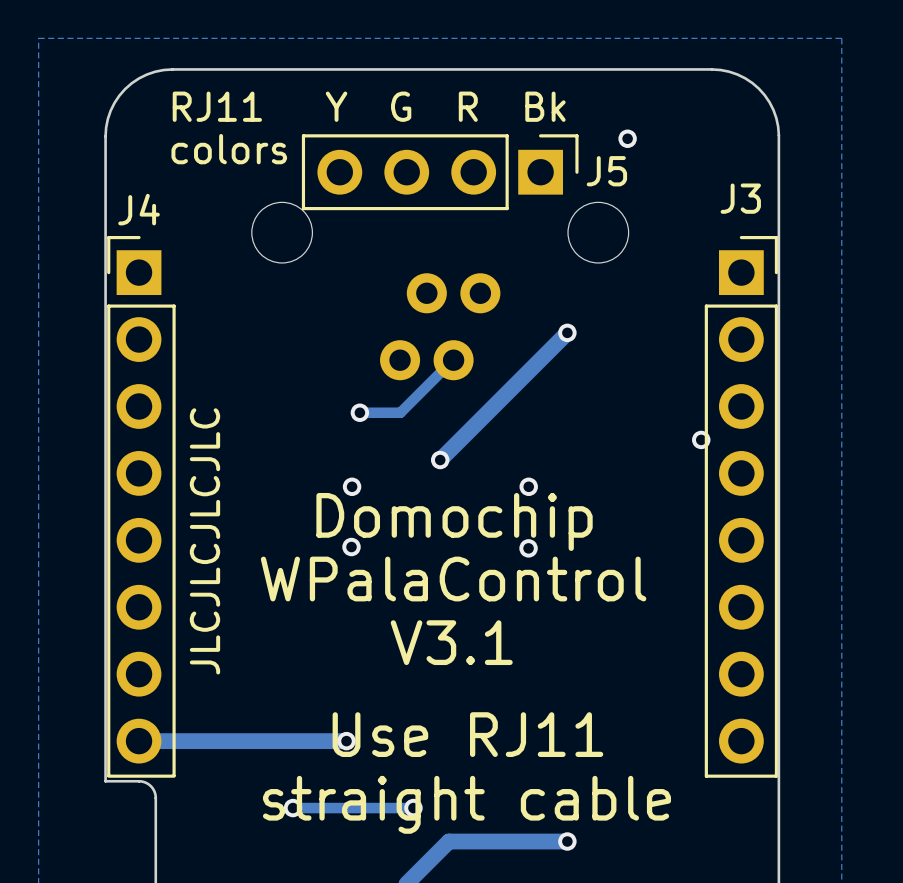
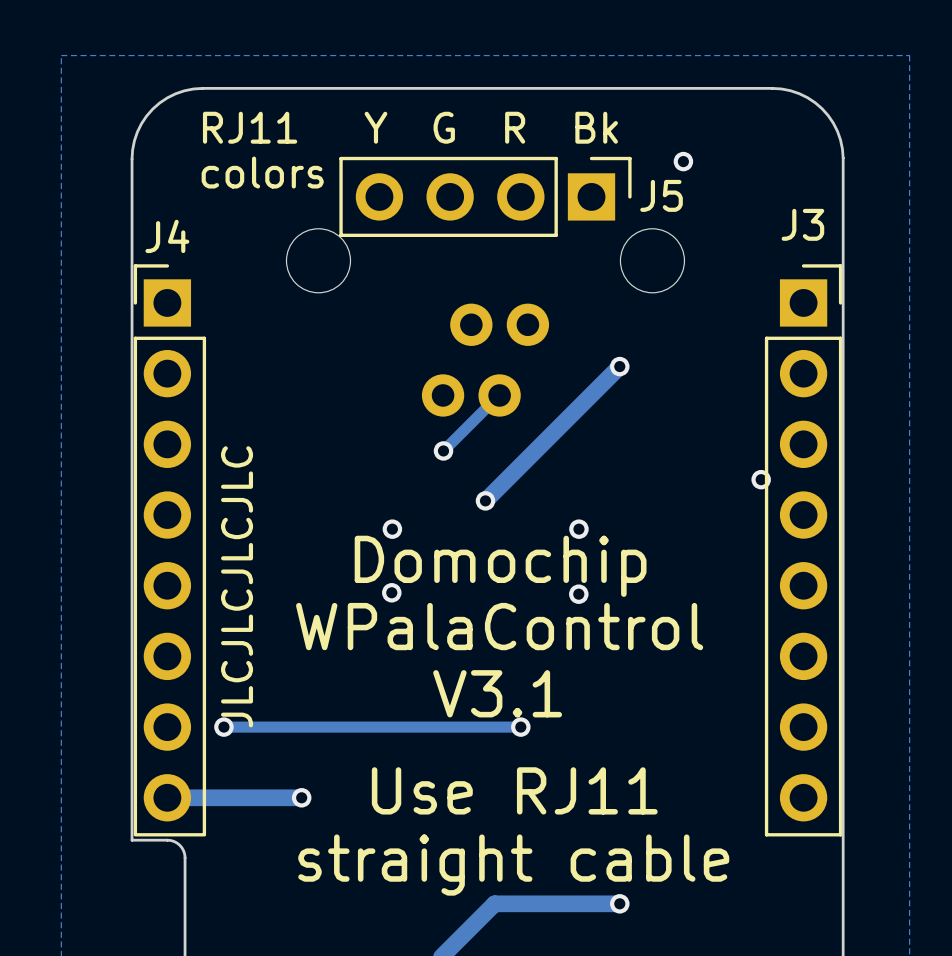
via position: (359, 412) -> (443, 450)
track: (400, 412) (359, 412) -> none
via: none -> (223, 727)
track: none -> (520, 727) (223, 727)
via: none -> (520, 727)
via: none -> (301, 797)
track: (346, 741) (266, 741) -> none
via: (346, 741) -> none
via: (292, 808) -> none
track: (413, 808) (292, 808) -> none
via: (413, 808) -> none

